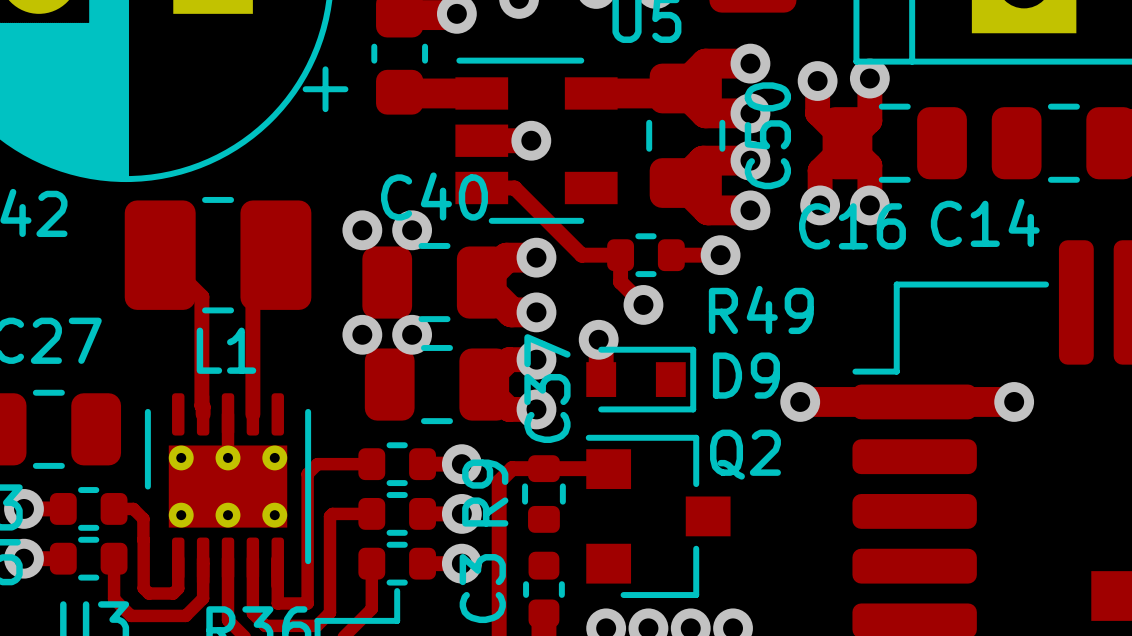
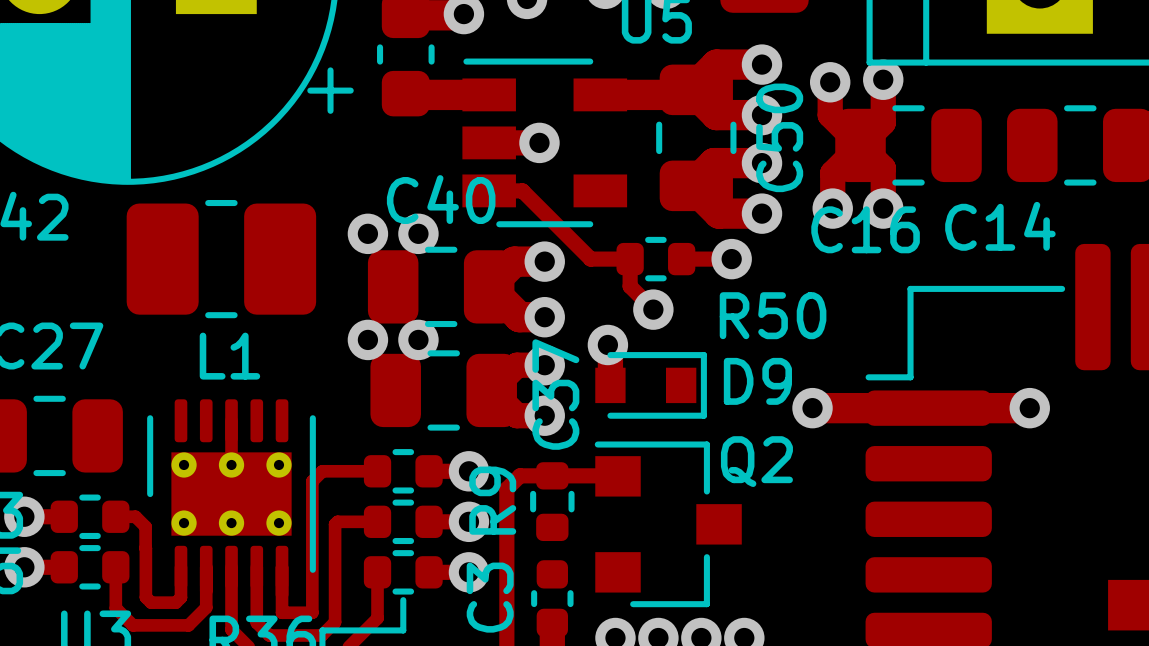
track: (160, 255) (201, 296) (203, 414) -> none
track: (275, 255) (252, 278) (252, 414) -> none
R49 name: R49 (761, 309) -> R50 (773, 315)

